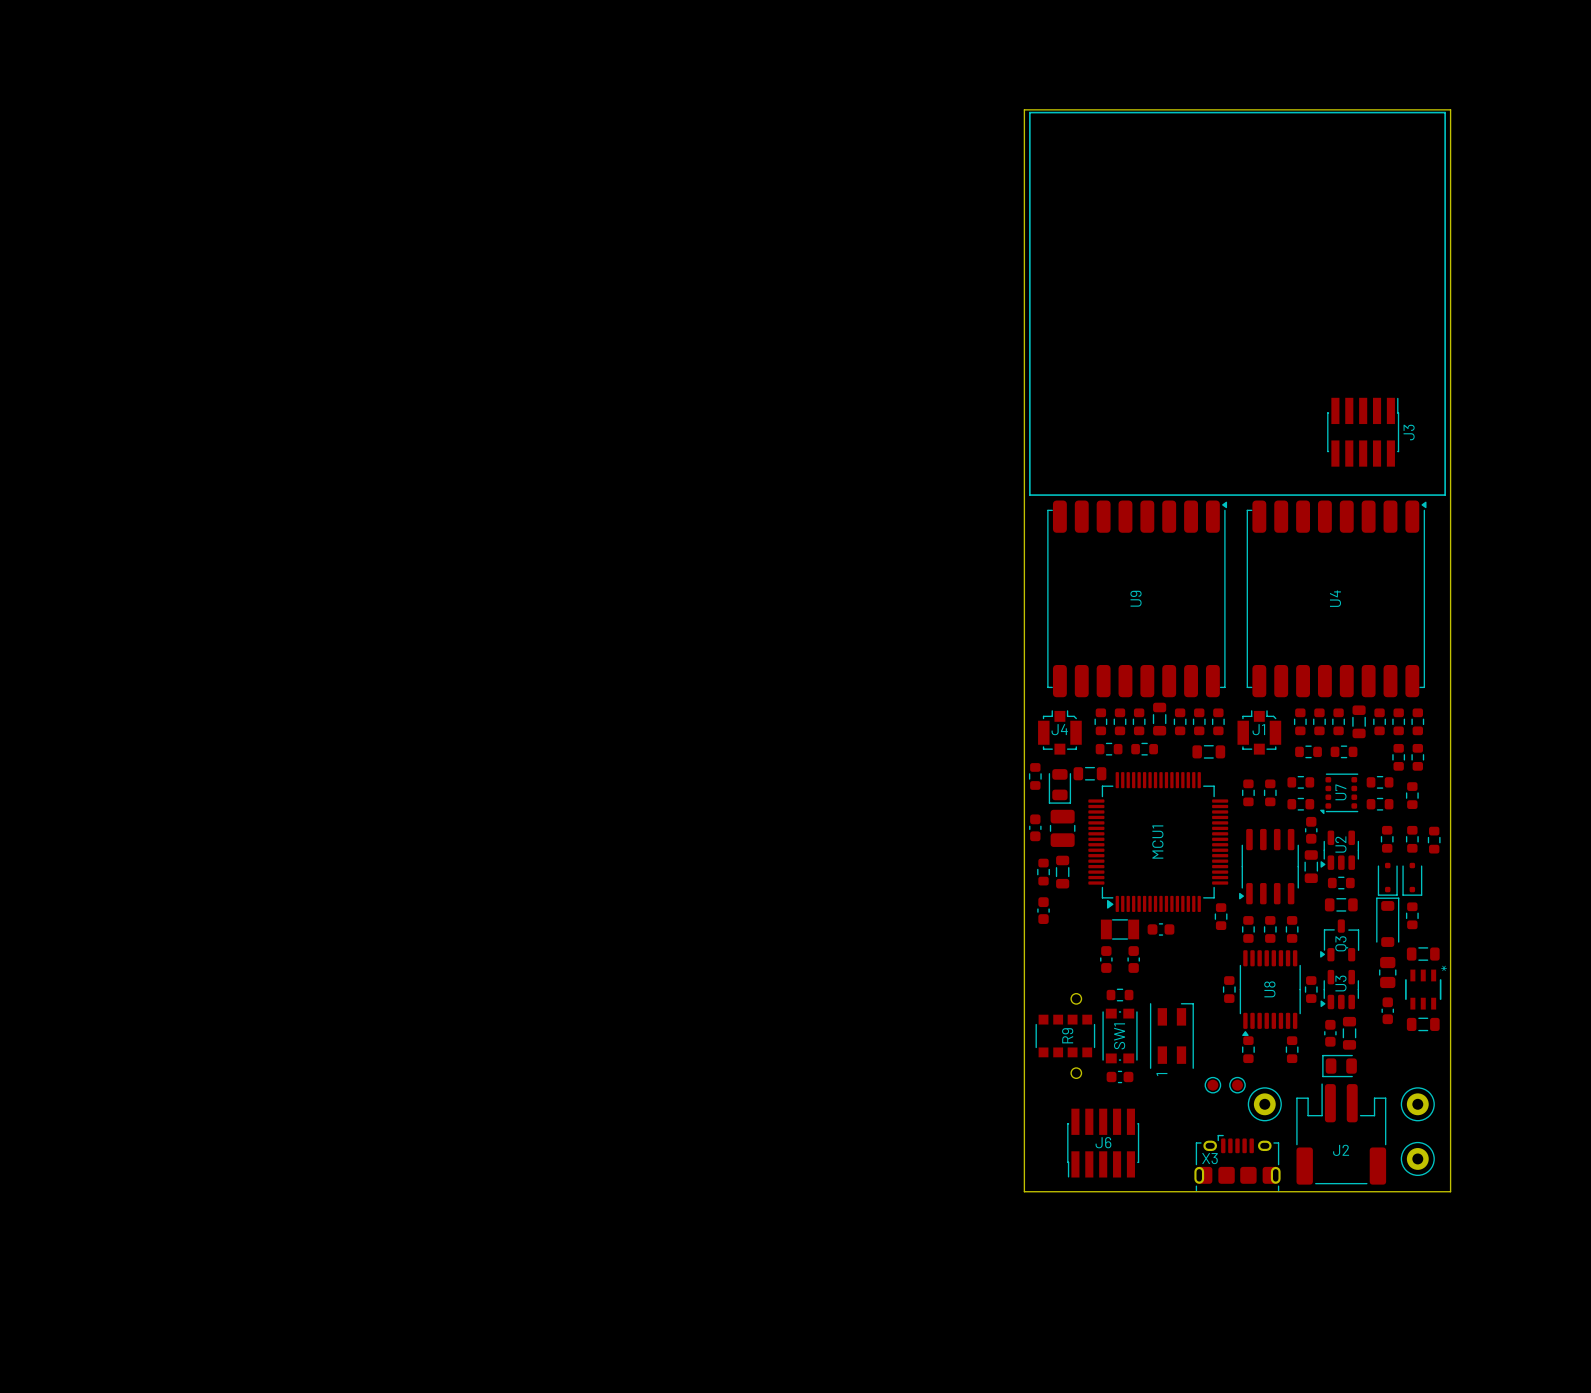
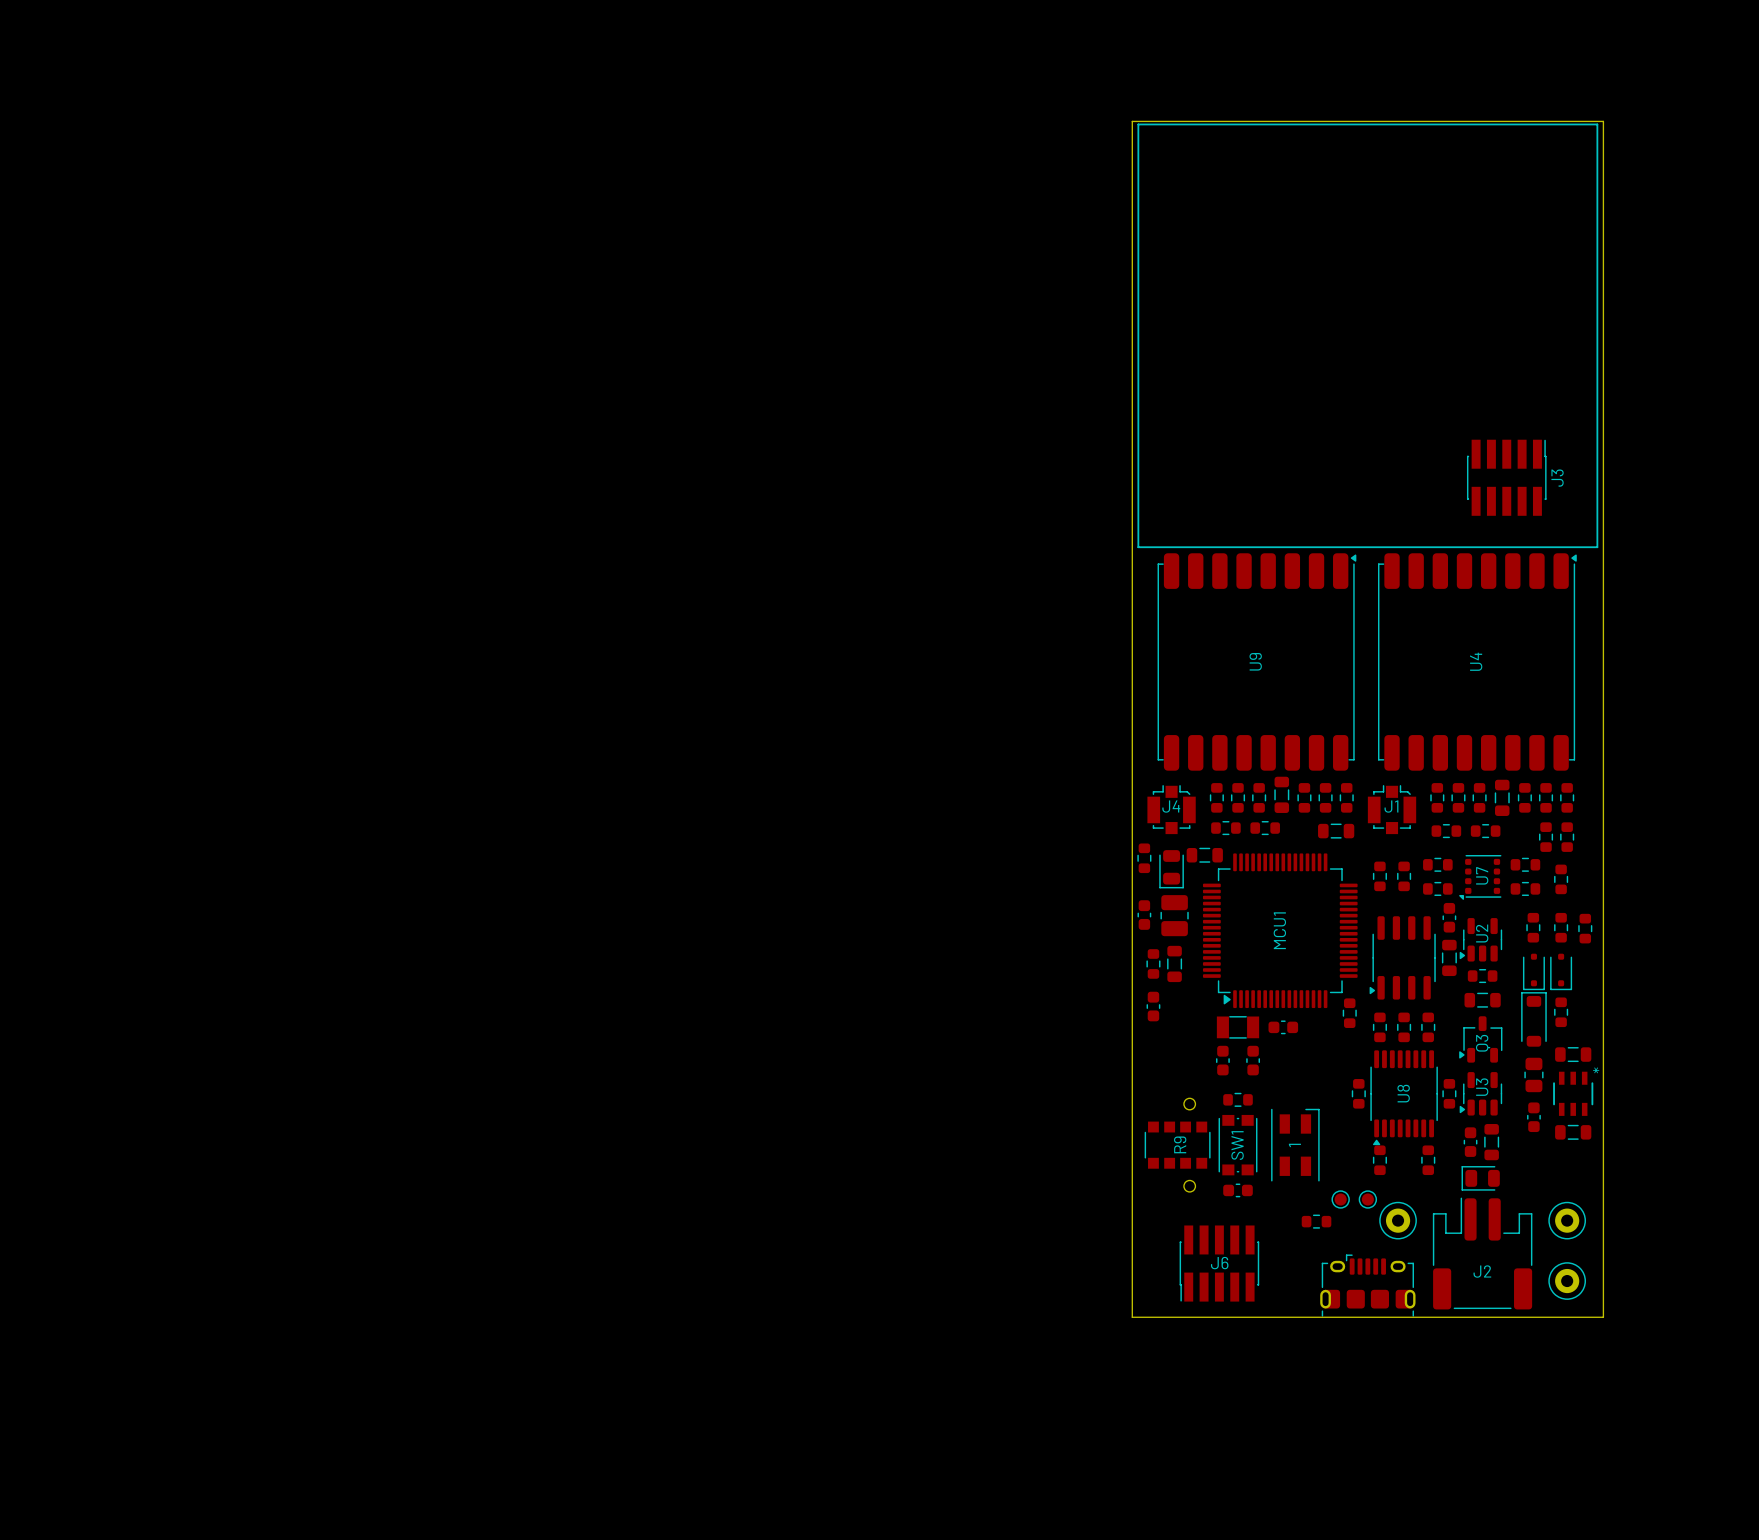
part text position: 1 (1161, 1074) -> 1 (1294, 1145)
part: none -> (1316, 1221)
X3 name: X3 (1209, 1158) -> none

